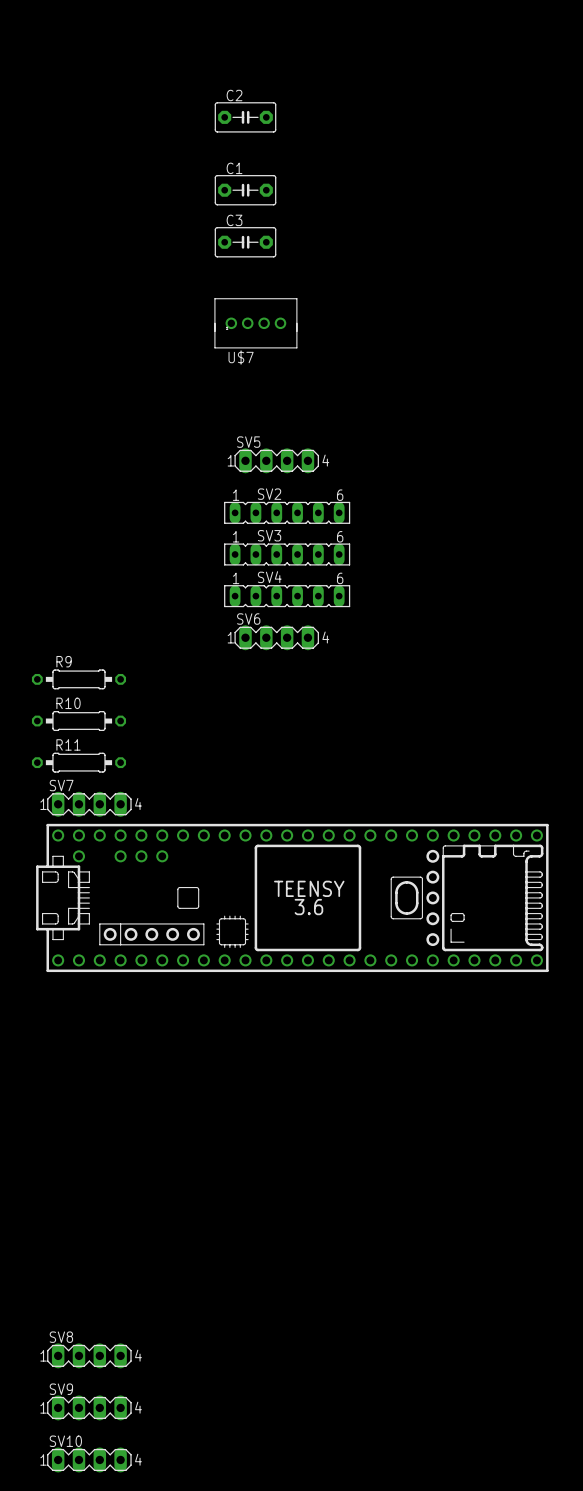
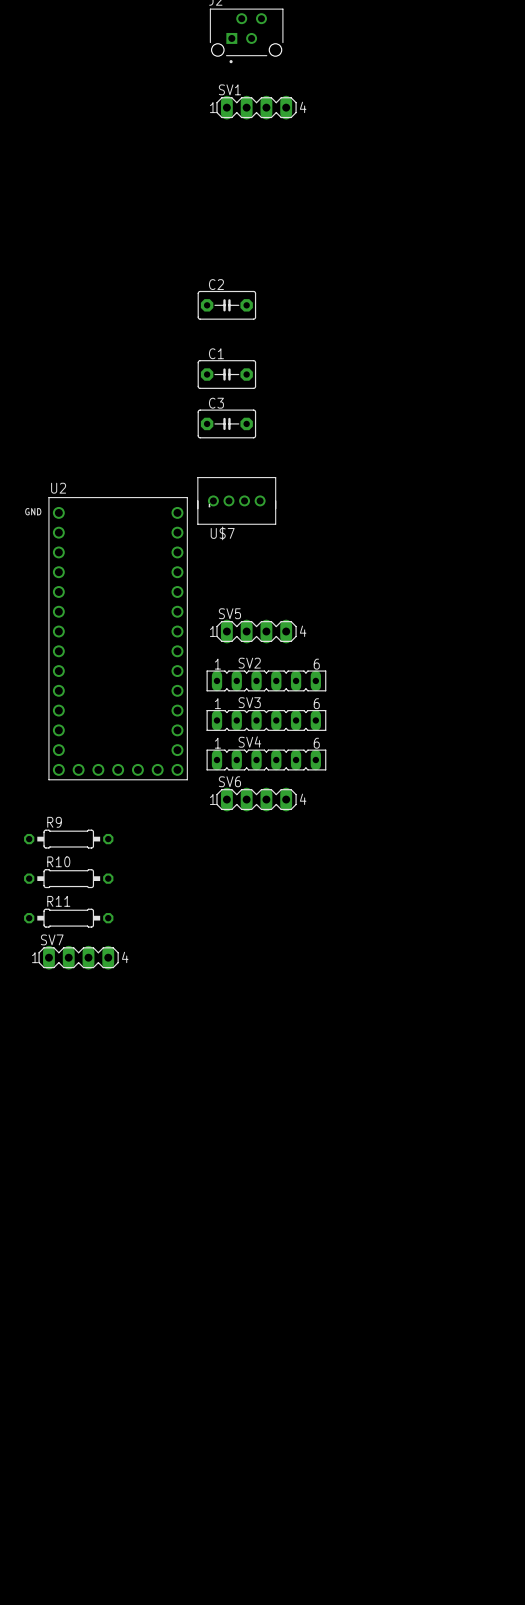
U2: none -> (118, 638)
part: (292, 897) -> none
SV8: (89, 1355) -> none
SV9: (89, 1407) -> none
SV10: (89, 1459) -> none

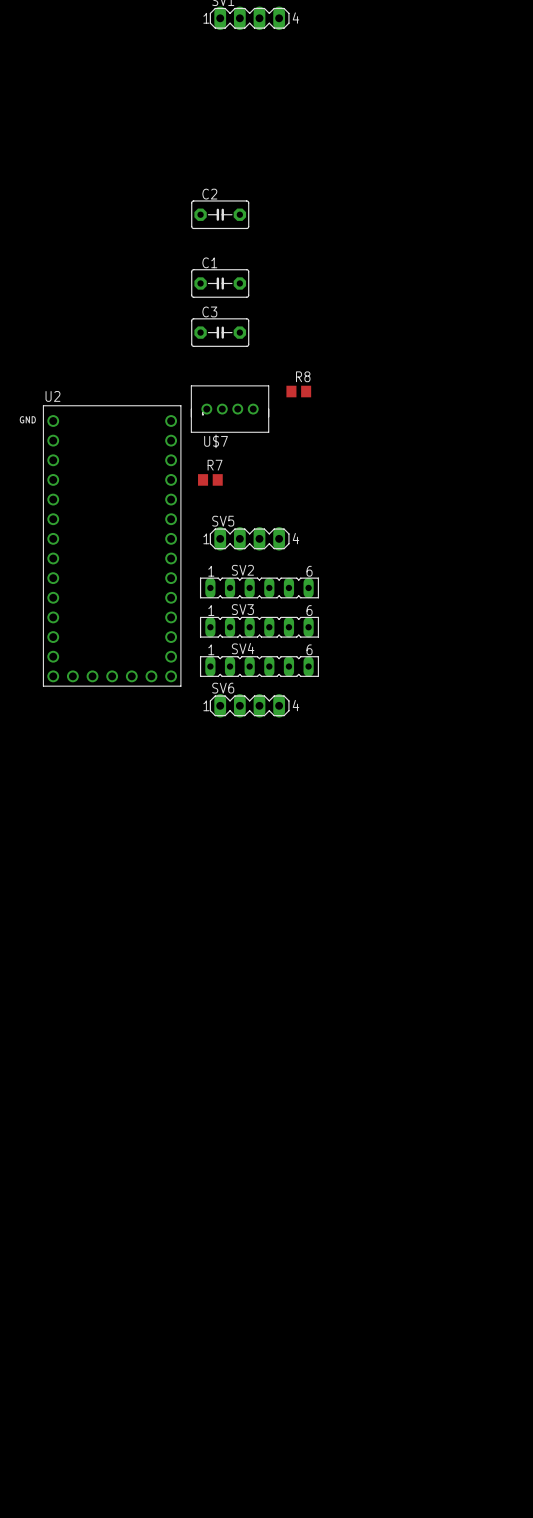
R8: none -> (298, 391)
R7: none -> (210, 479)
R9: (68, 839) -> none
R10: (68, 878) -> none
R11: (68, 918) -> none
SV7: (78, 957) -> none

